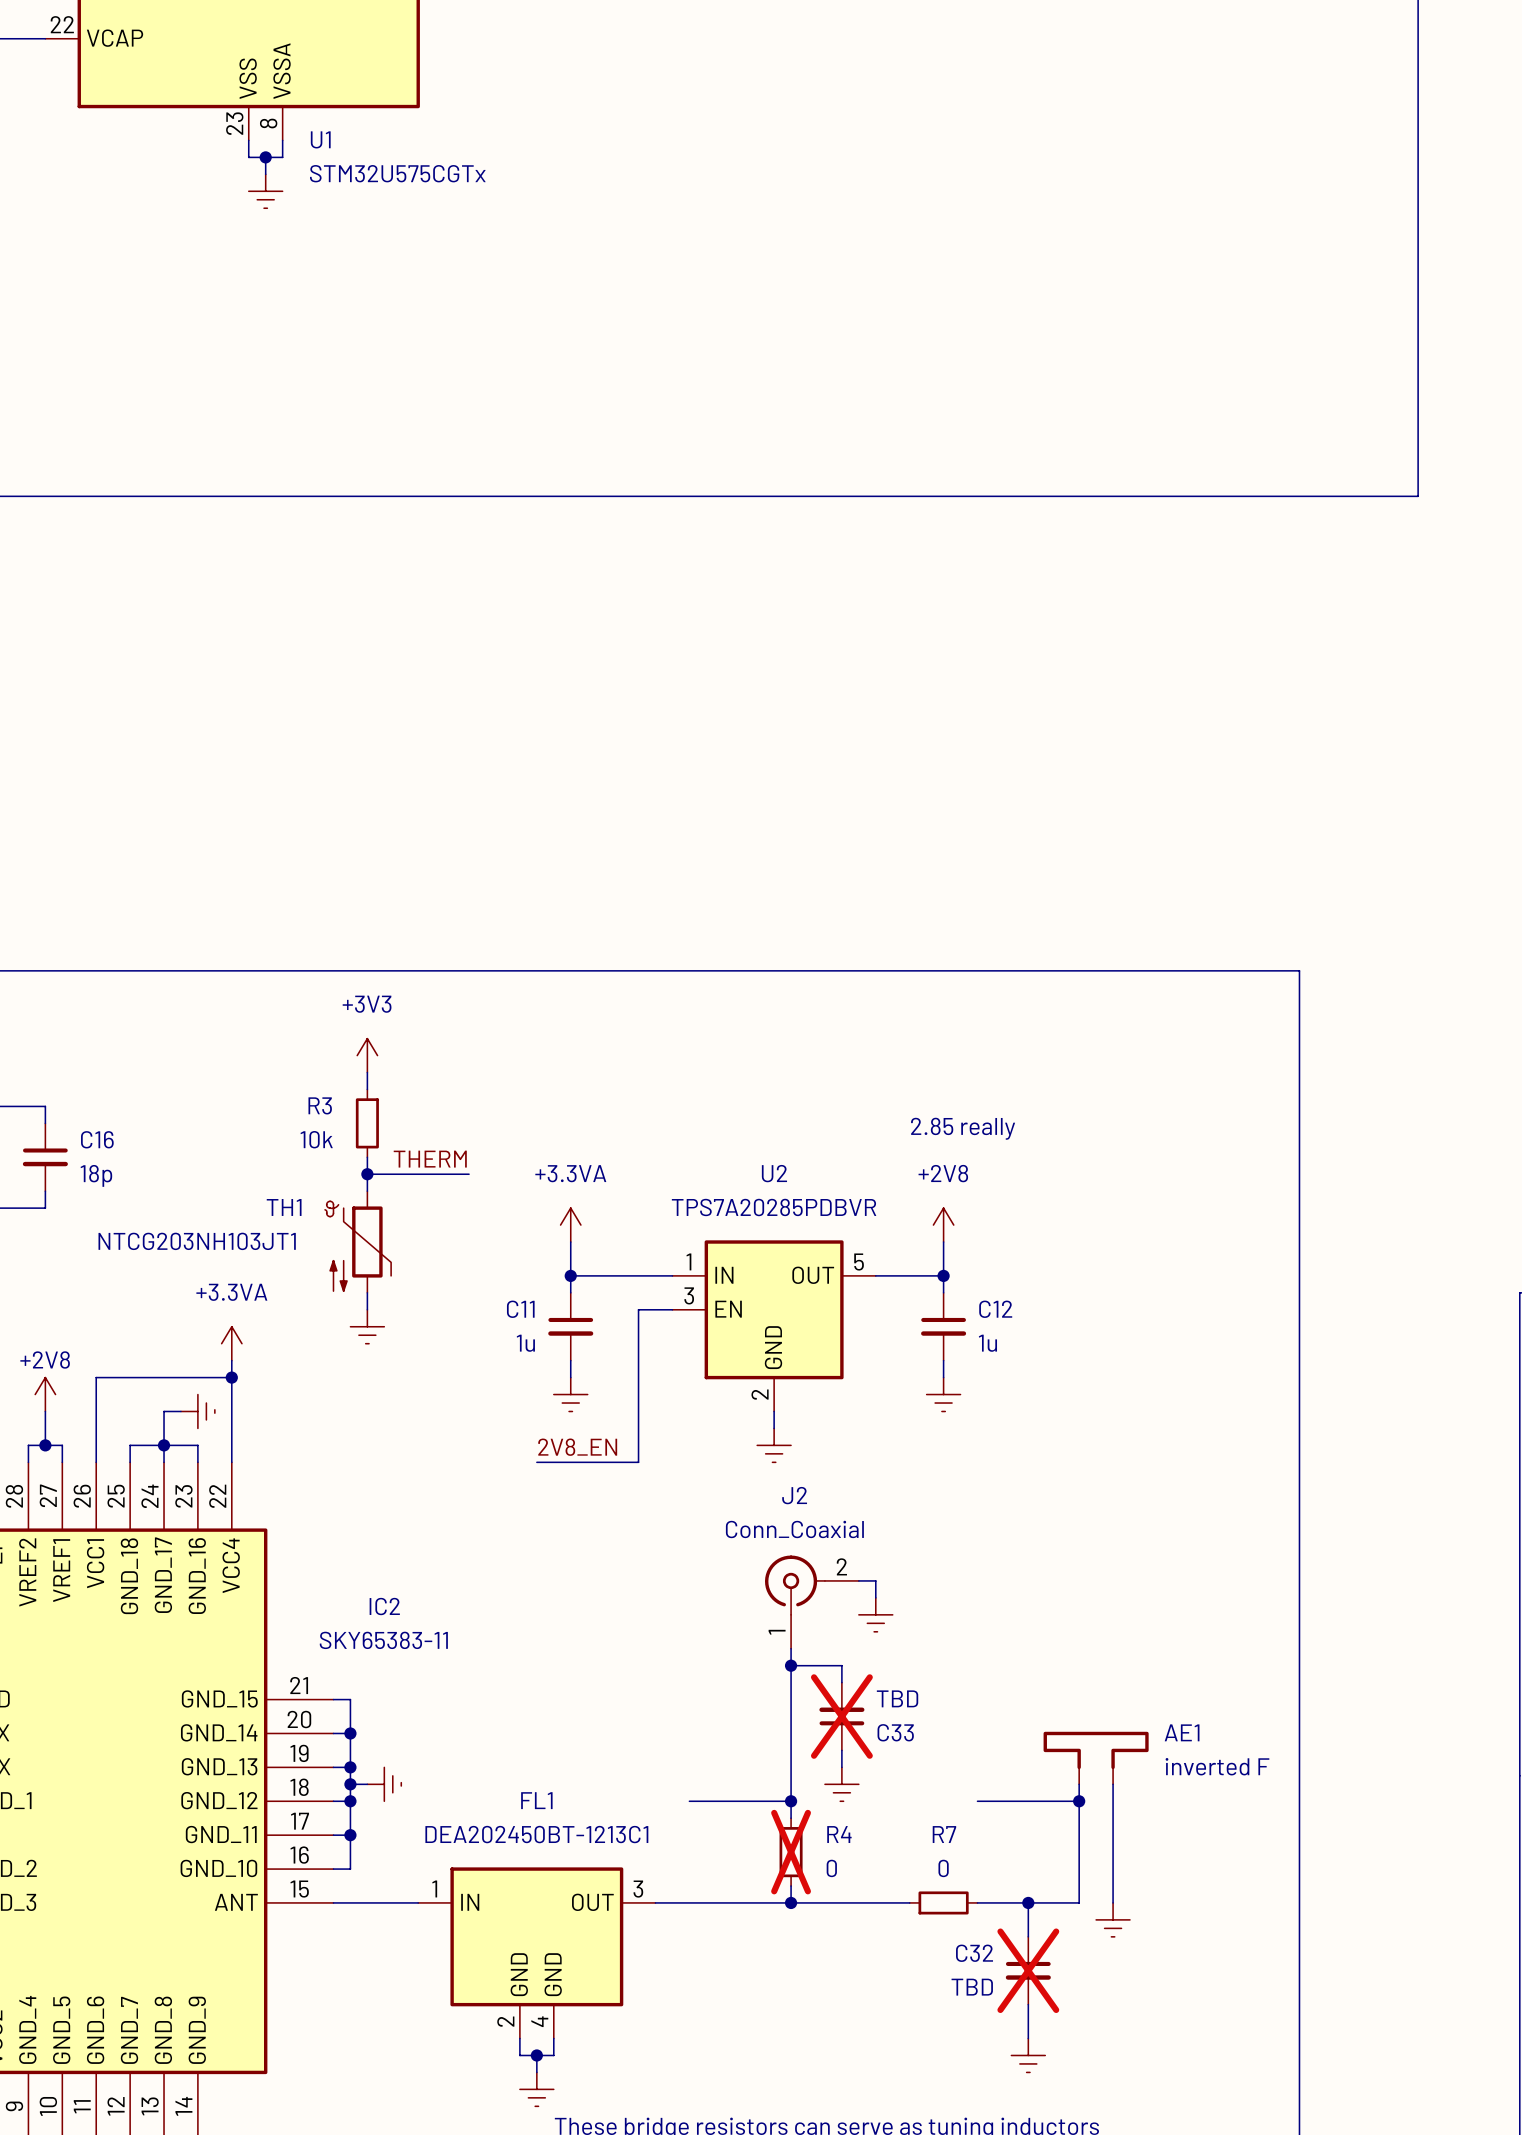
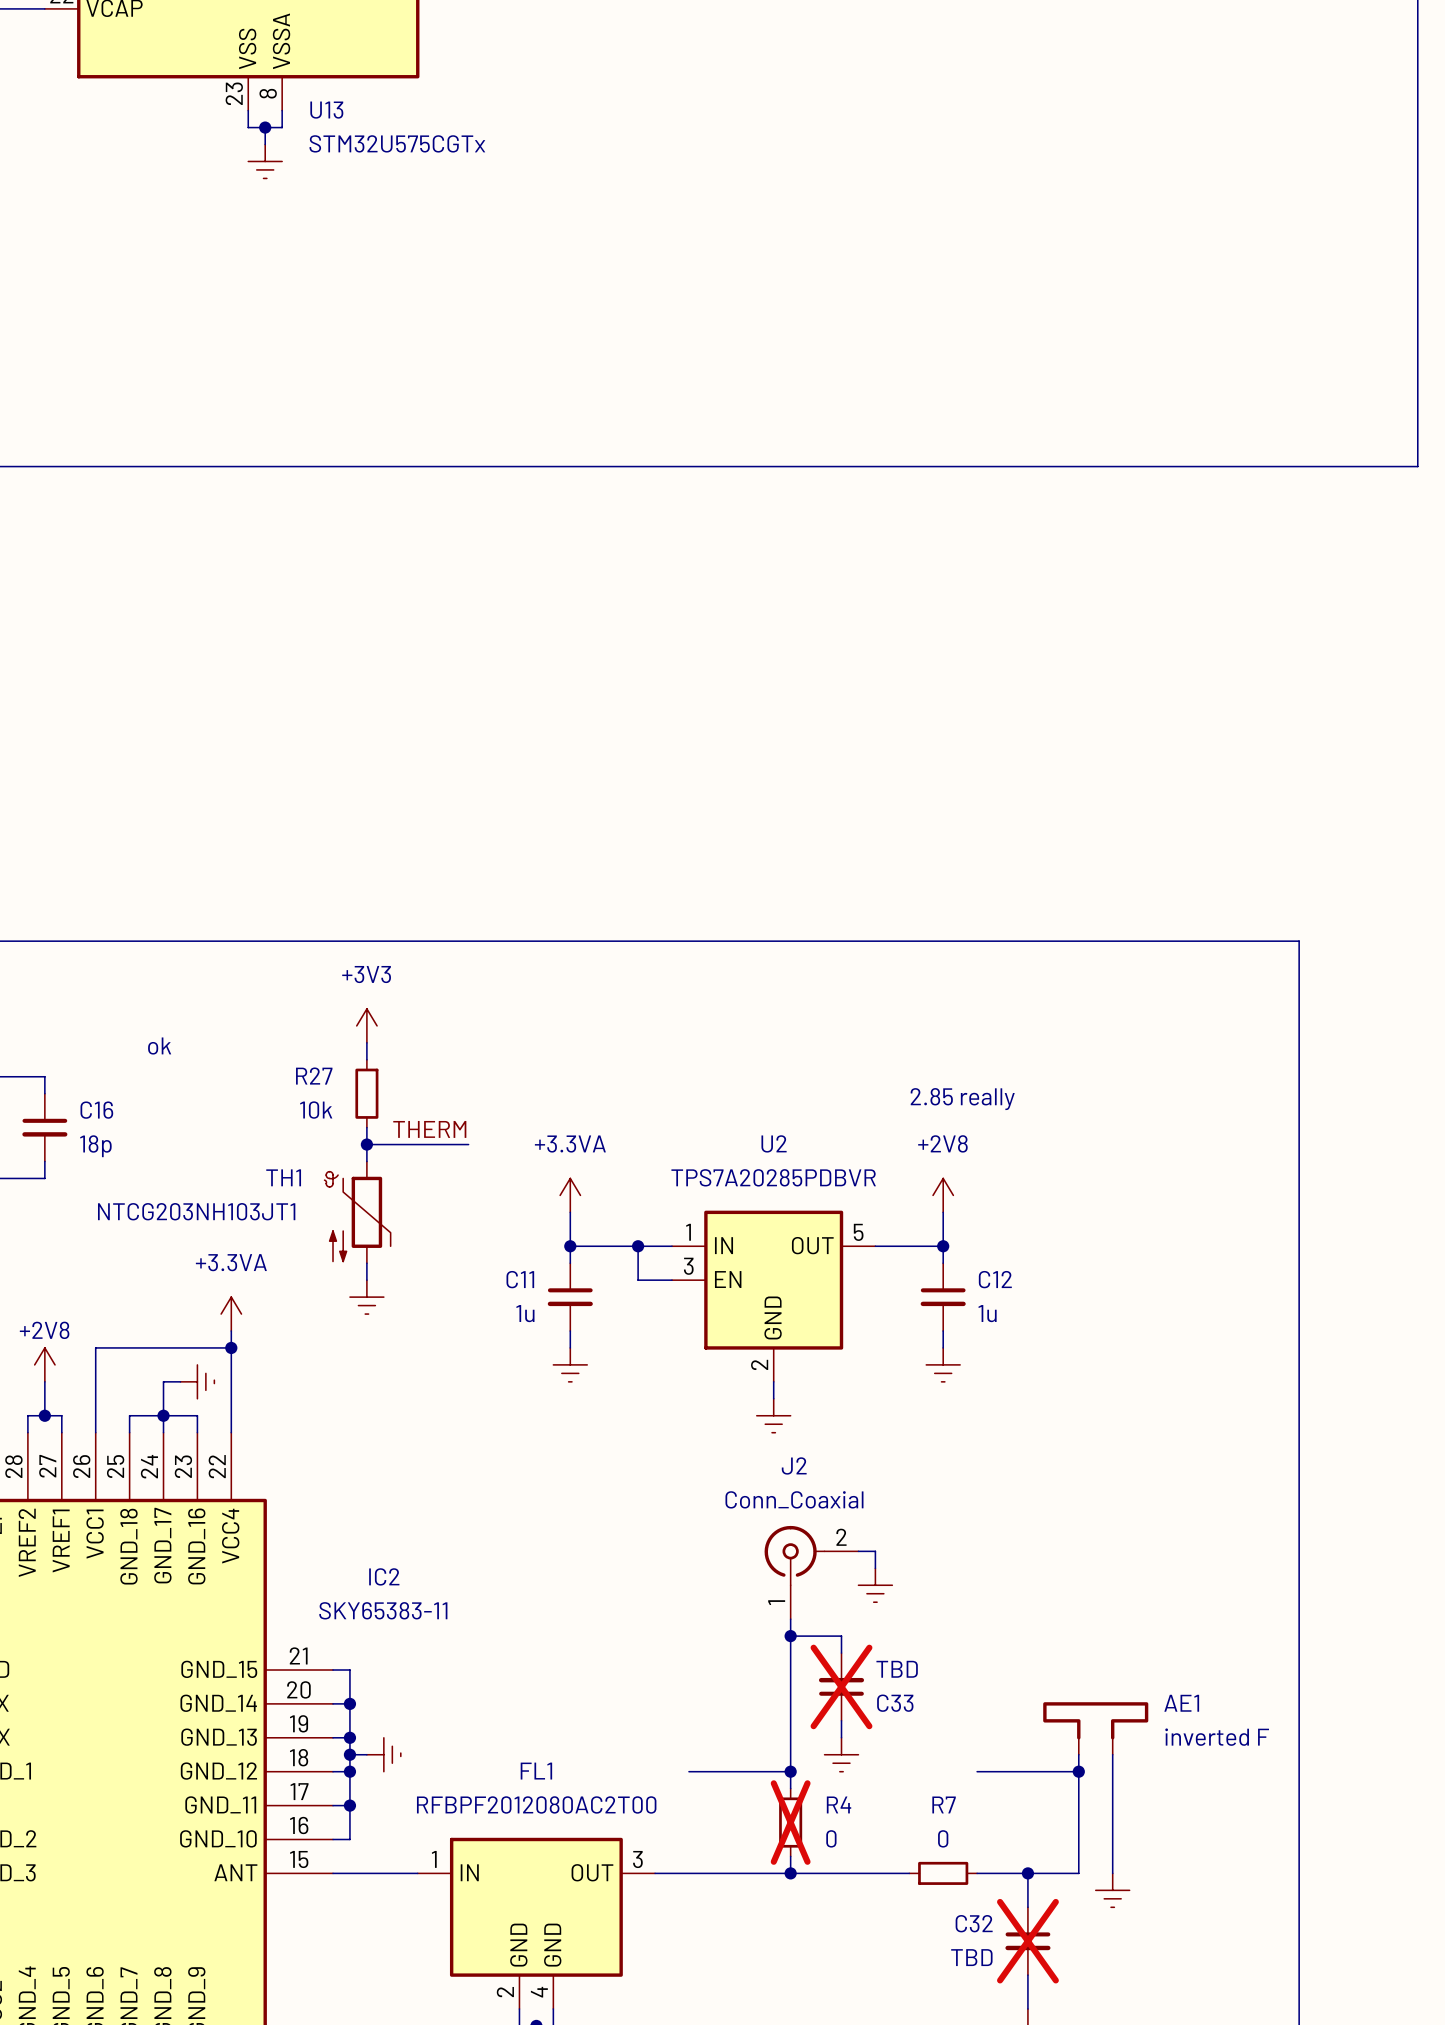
U1 name: U1 (320, 139) -> U13 (326, 110)
text: none -> ok (159, 1046)
R3 name: R3 (320, 1105) -> R27 (314, 1076)
junction: none -> (638, 1246)
wire: (638, 1309) (638, 1462) (536, 1462) -> (638, 1280) (638, 1246)
label: 2V8_EN (577, 1447) -> none
FL1 value: DEA202450BT-1213C1 (536, 1834) -> RFBPF2012080AC2T00 (536, 1804)

